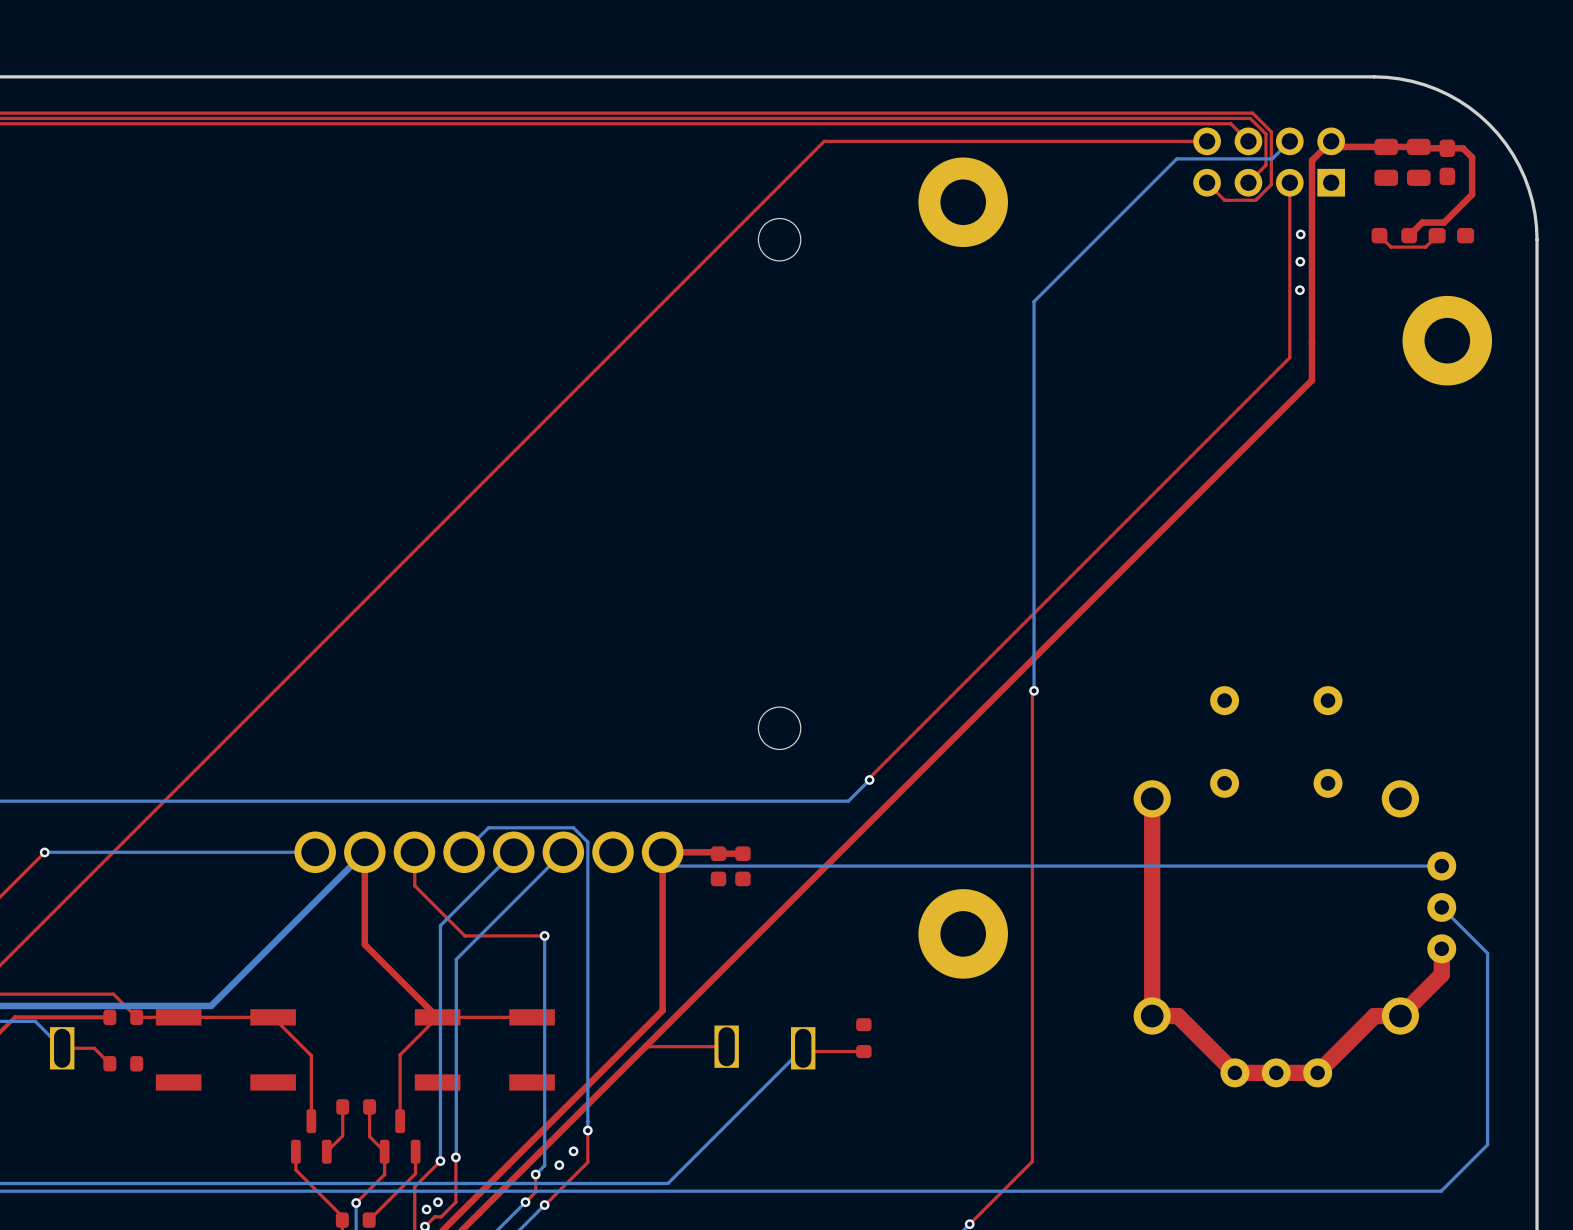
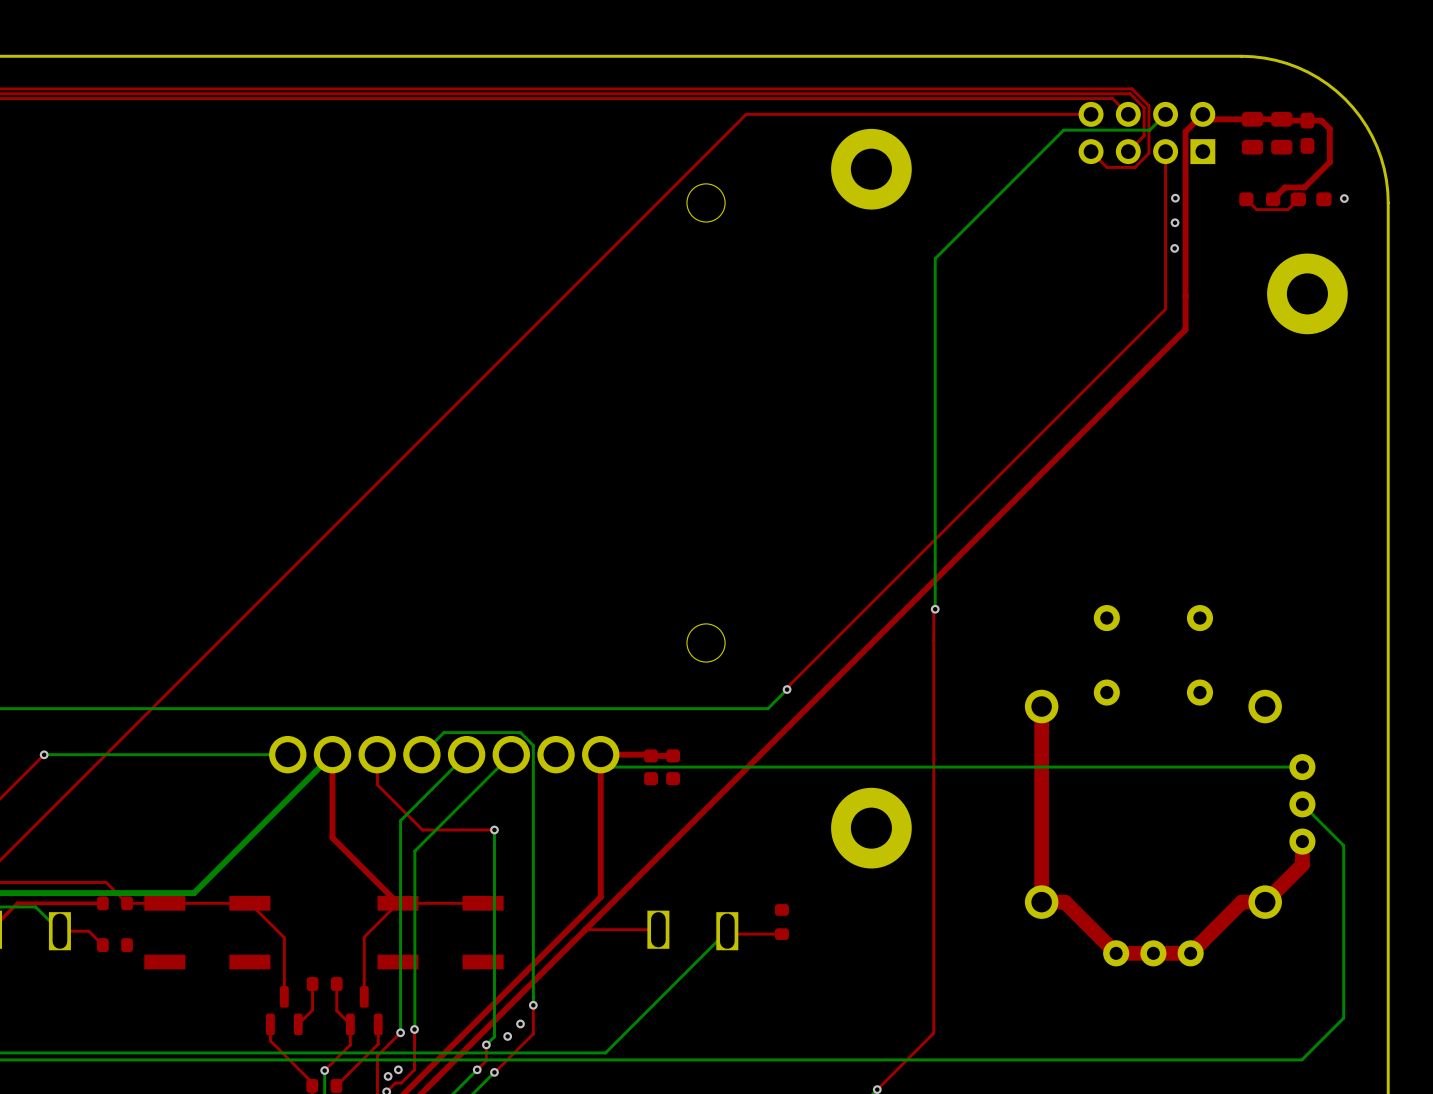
via: none -> (1344, 198)

